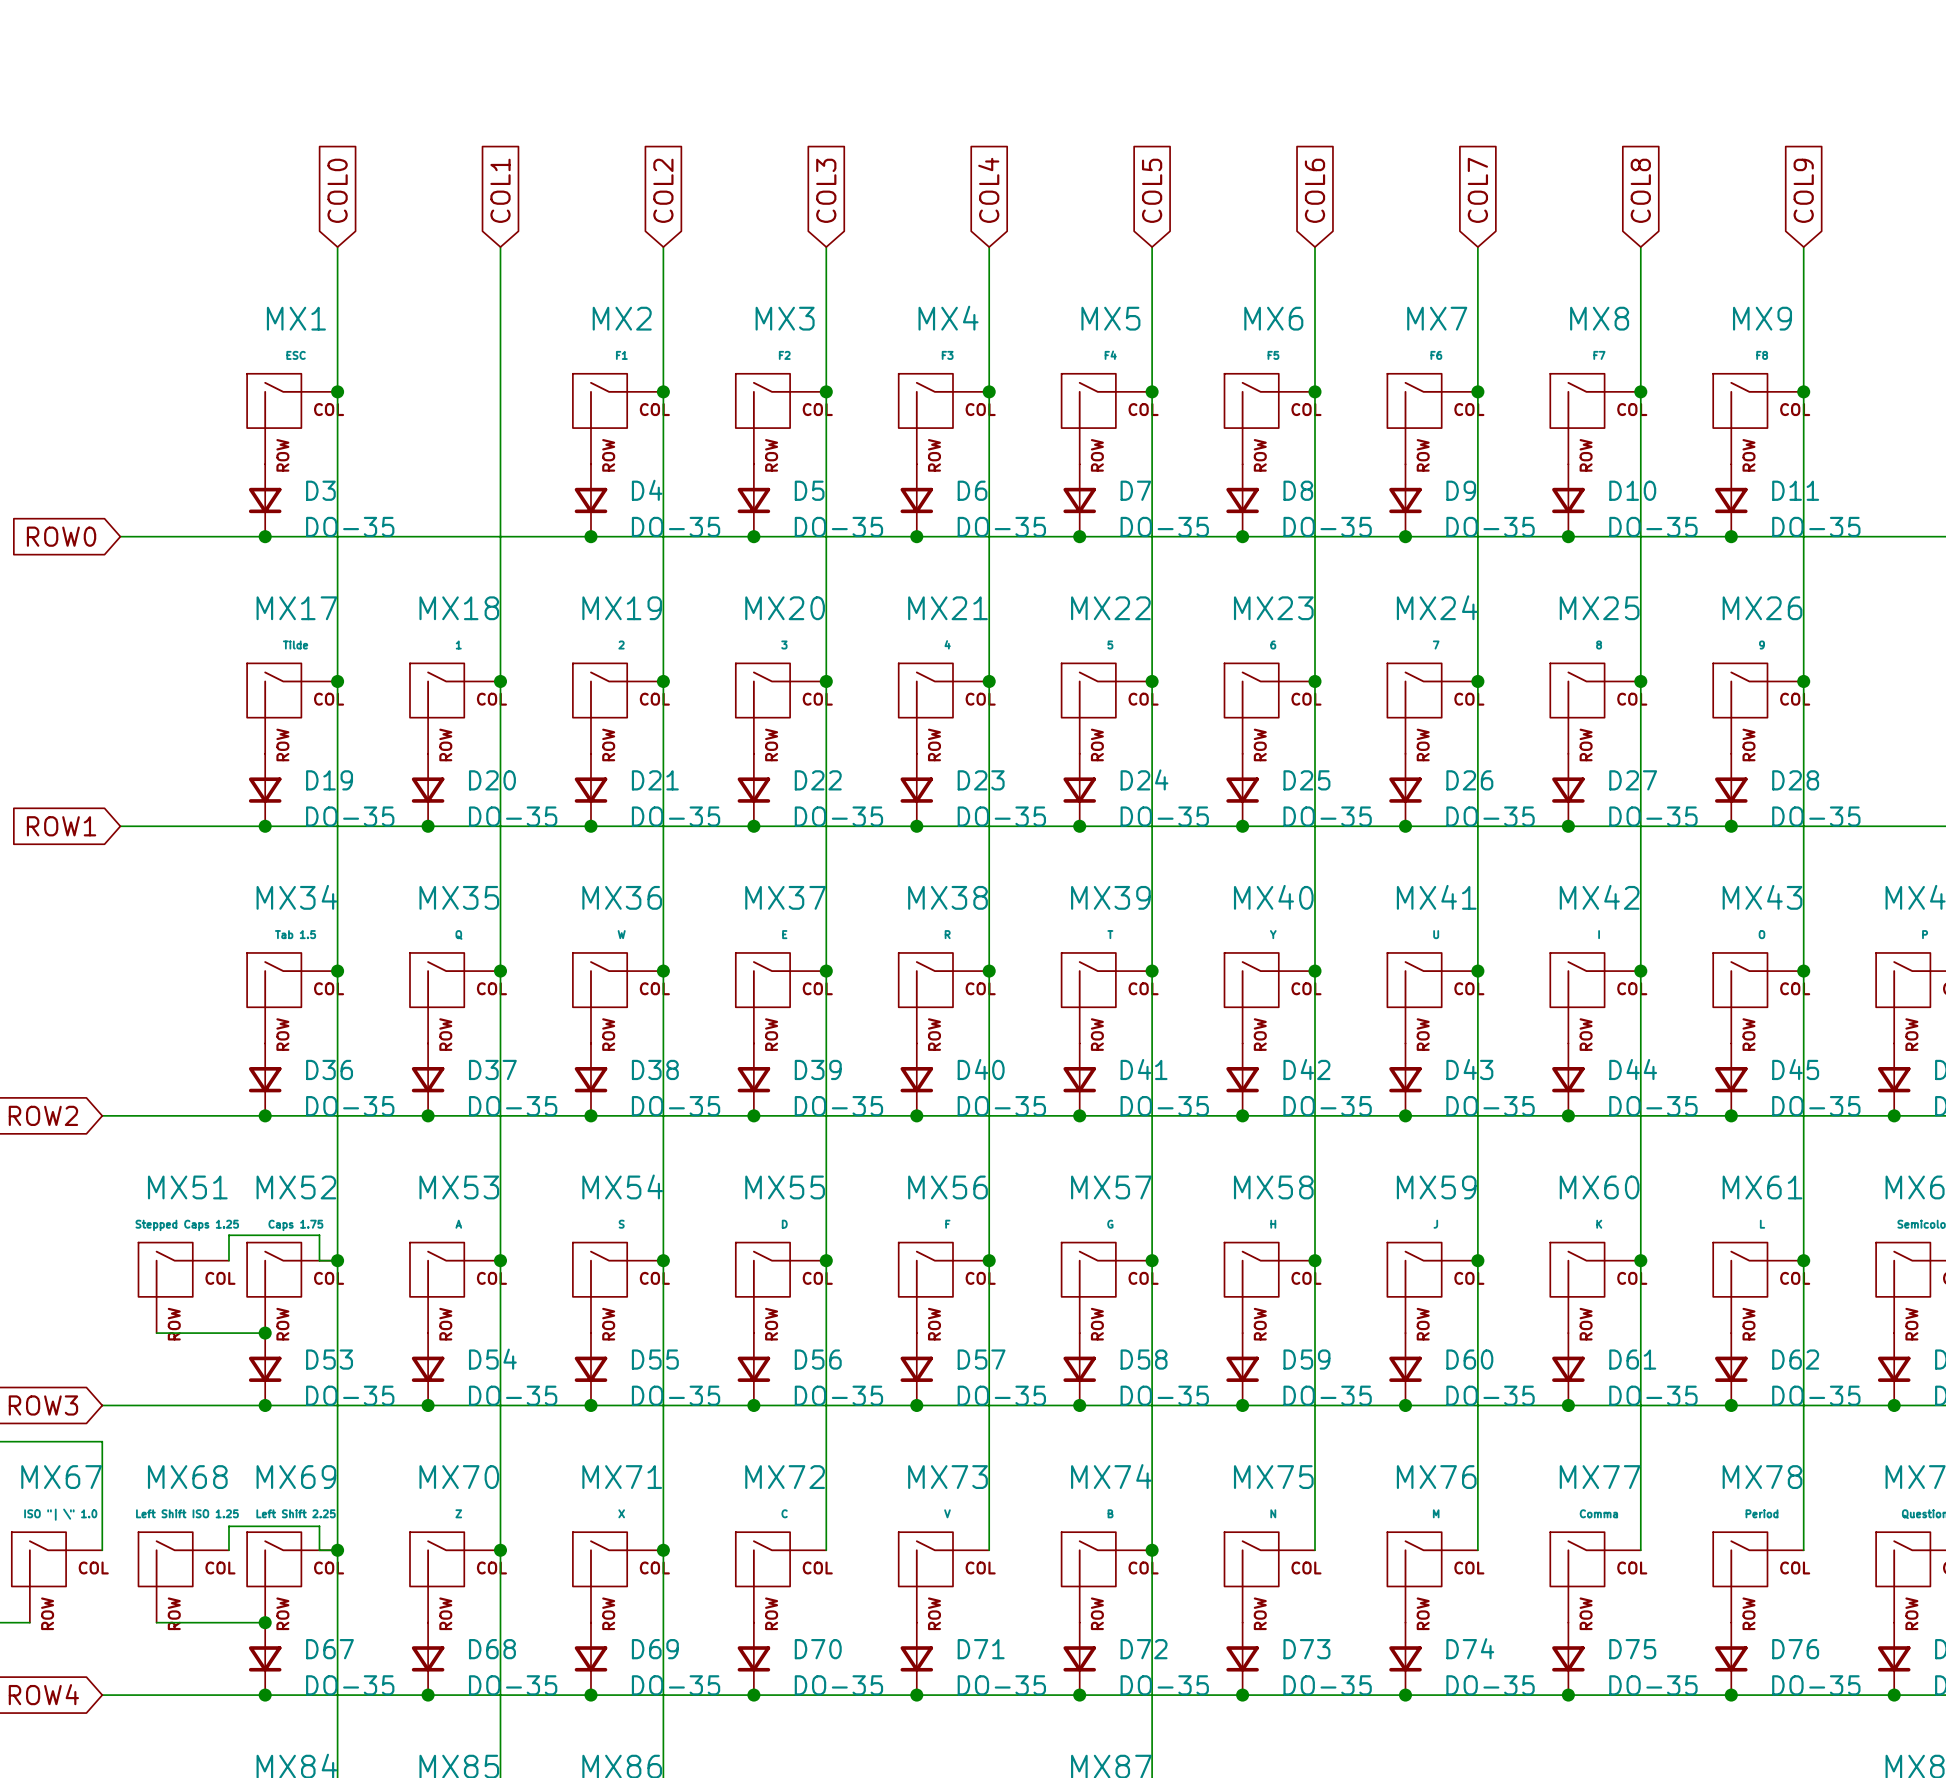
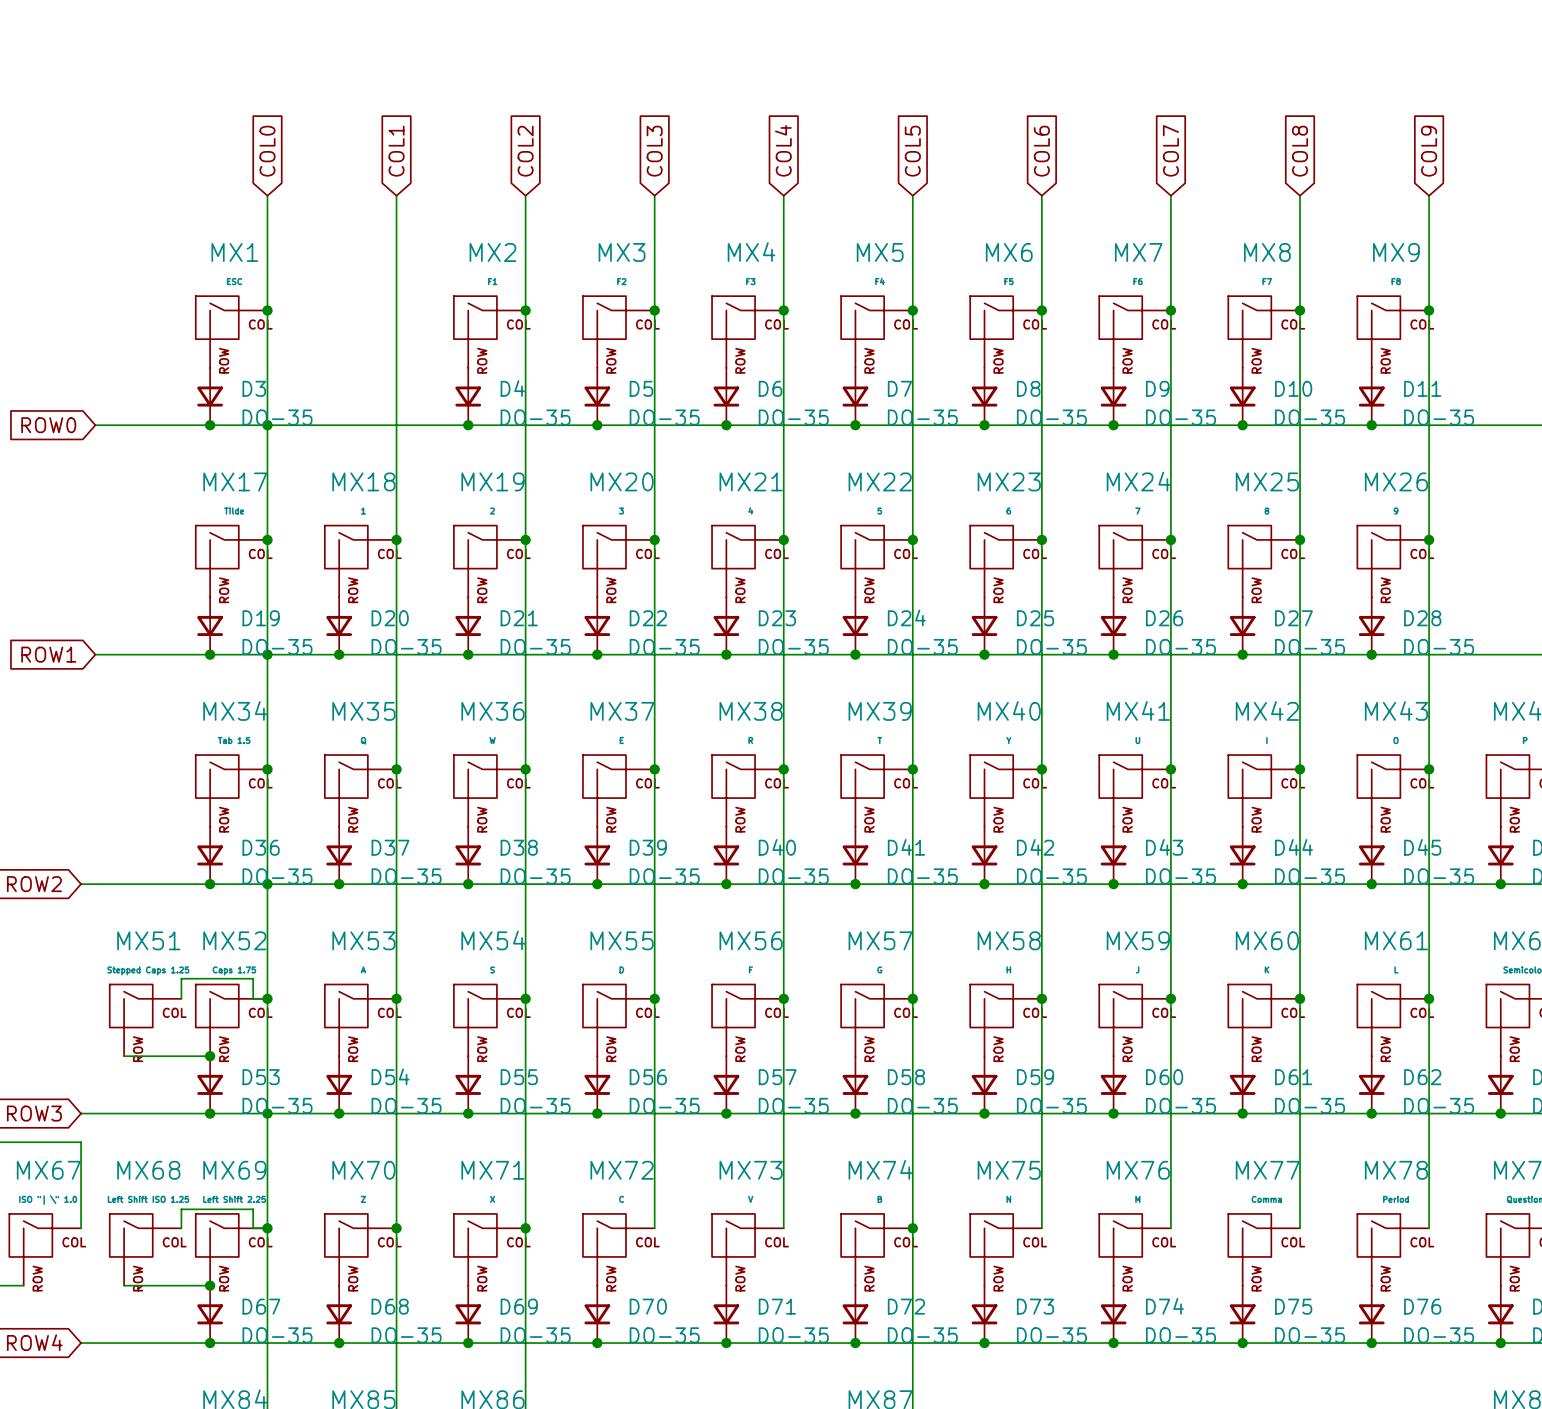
junction: none -> (267, 425)
junction: none -> (267, 654)
junction: none -> (267, 884)
junction: none -> (267, 1113)

